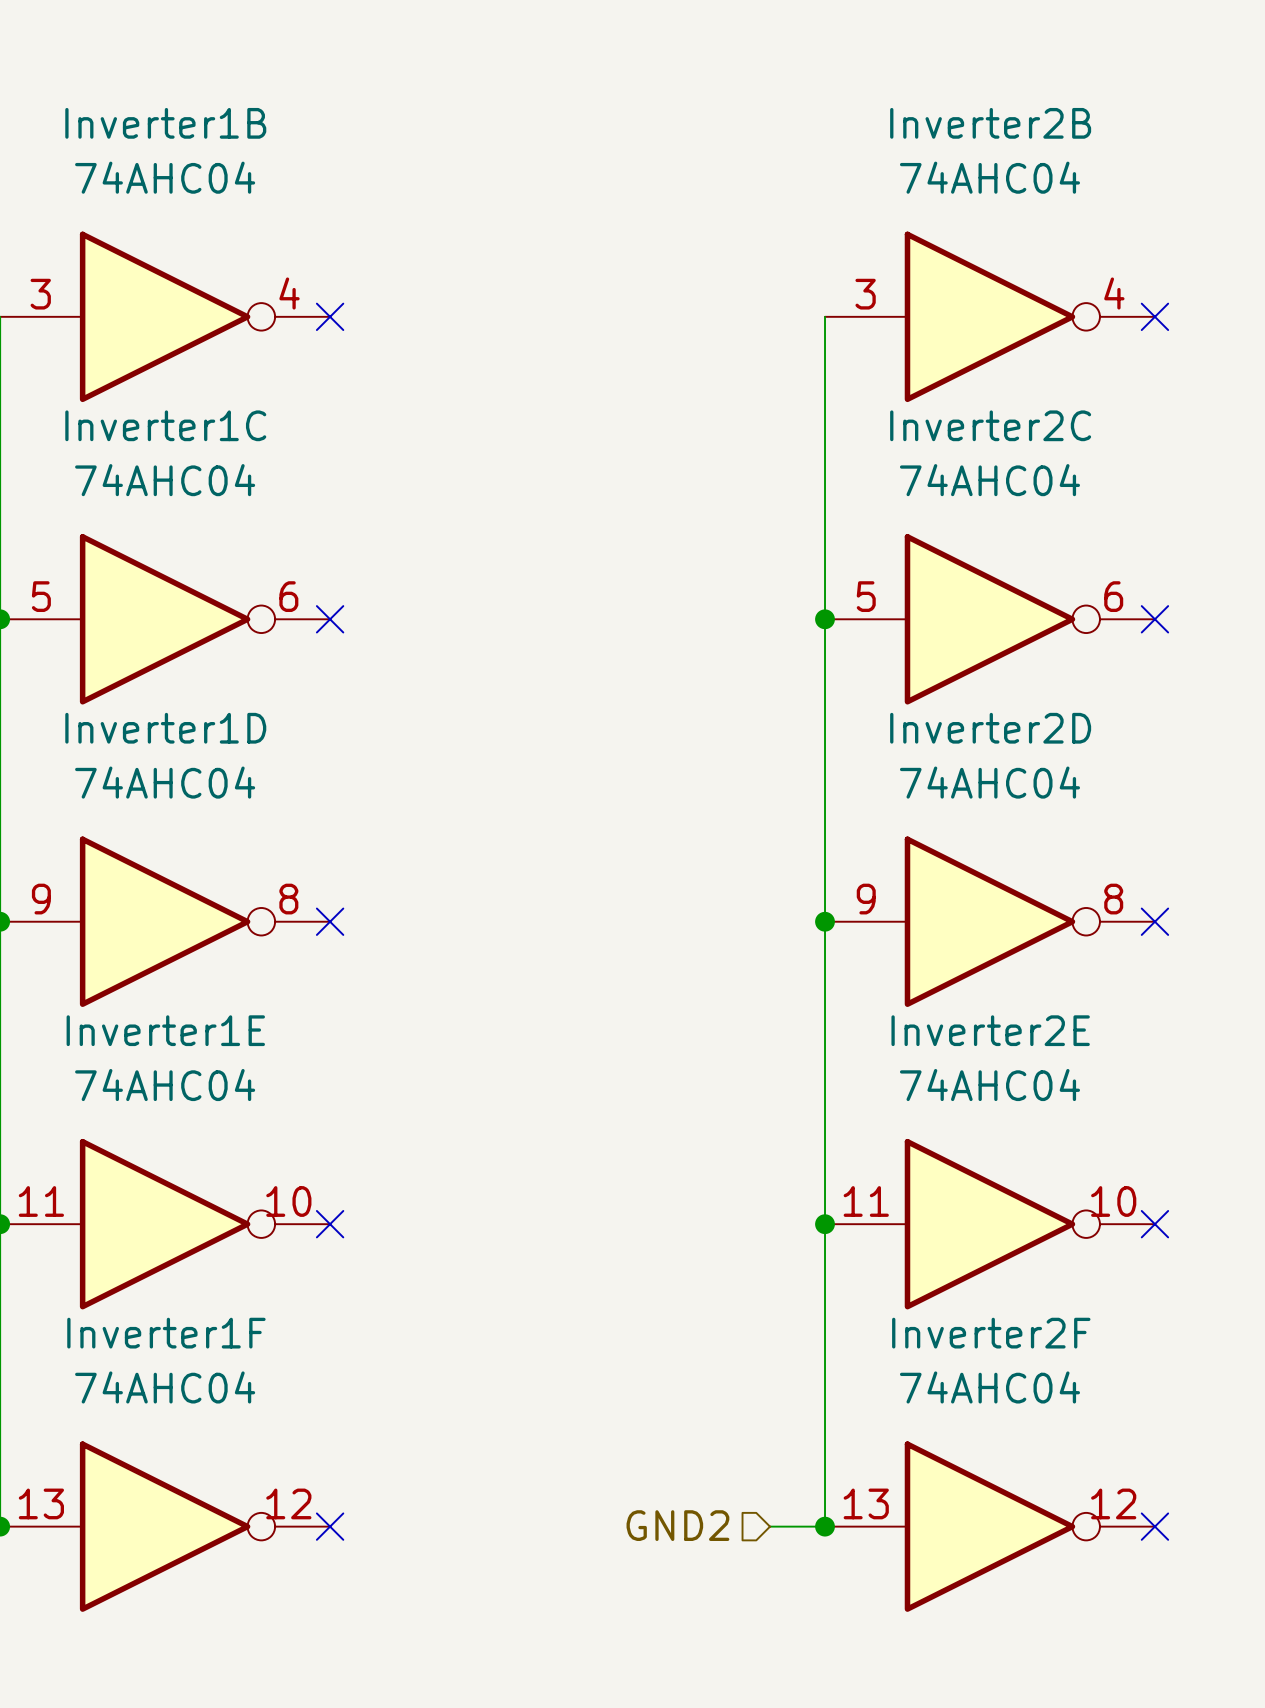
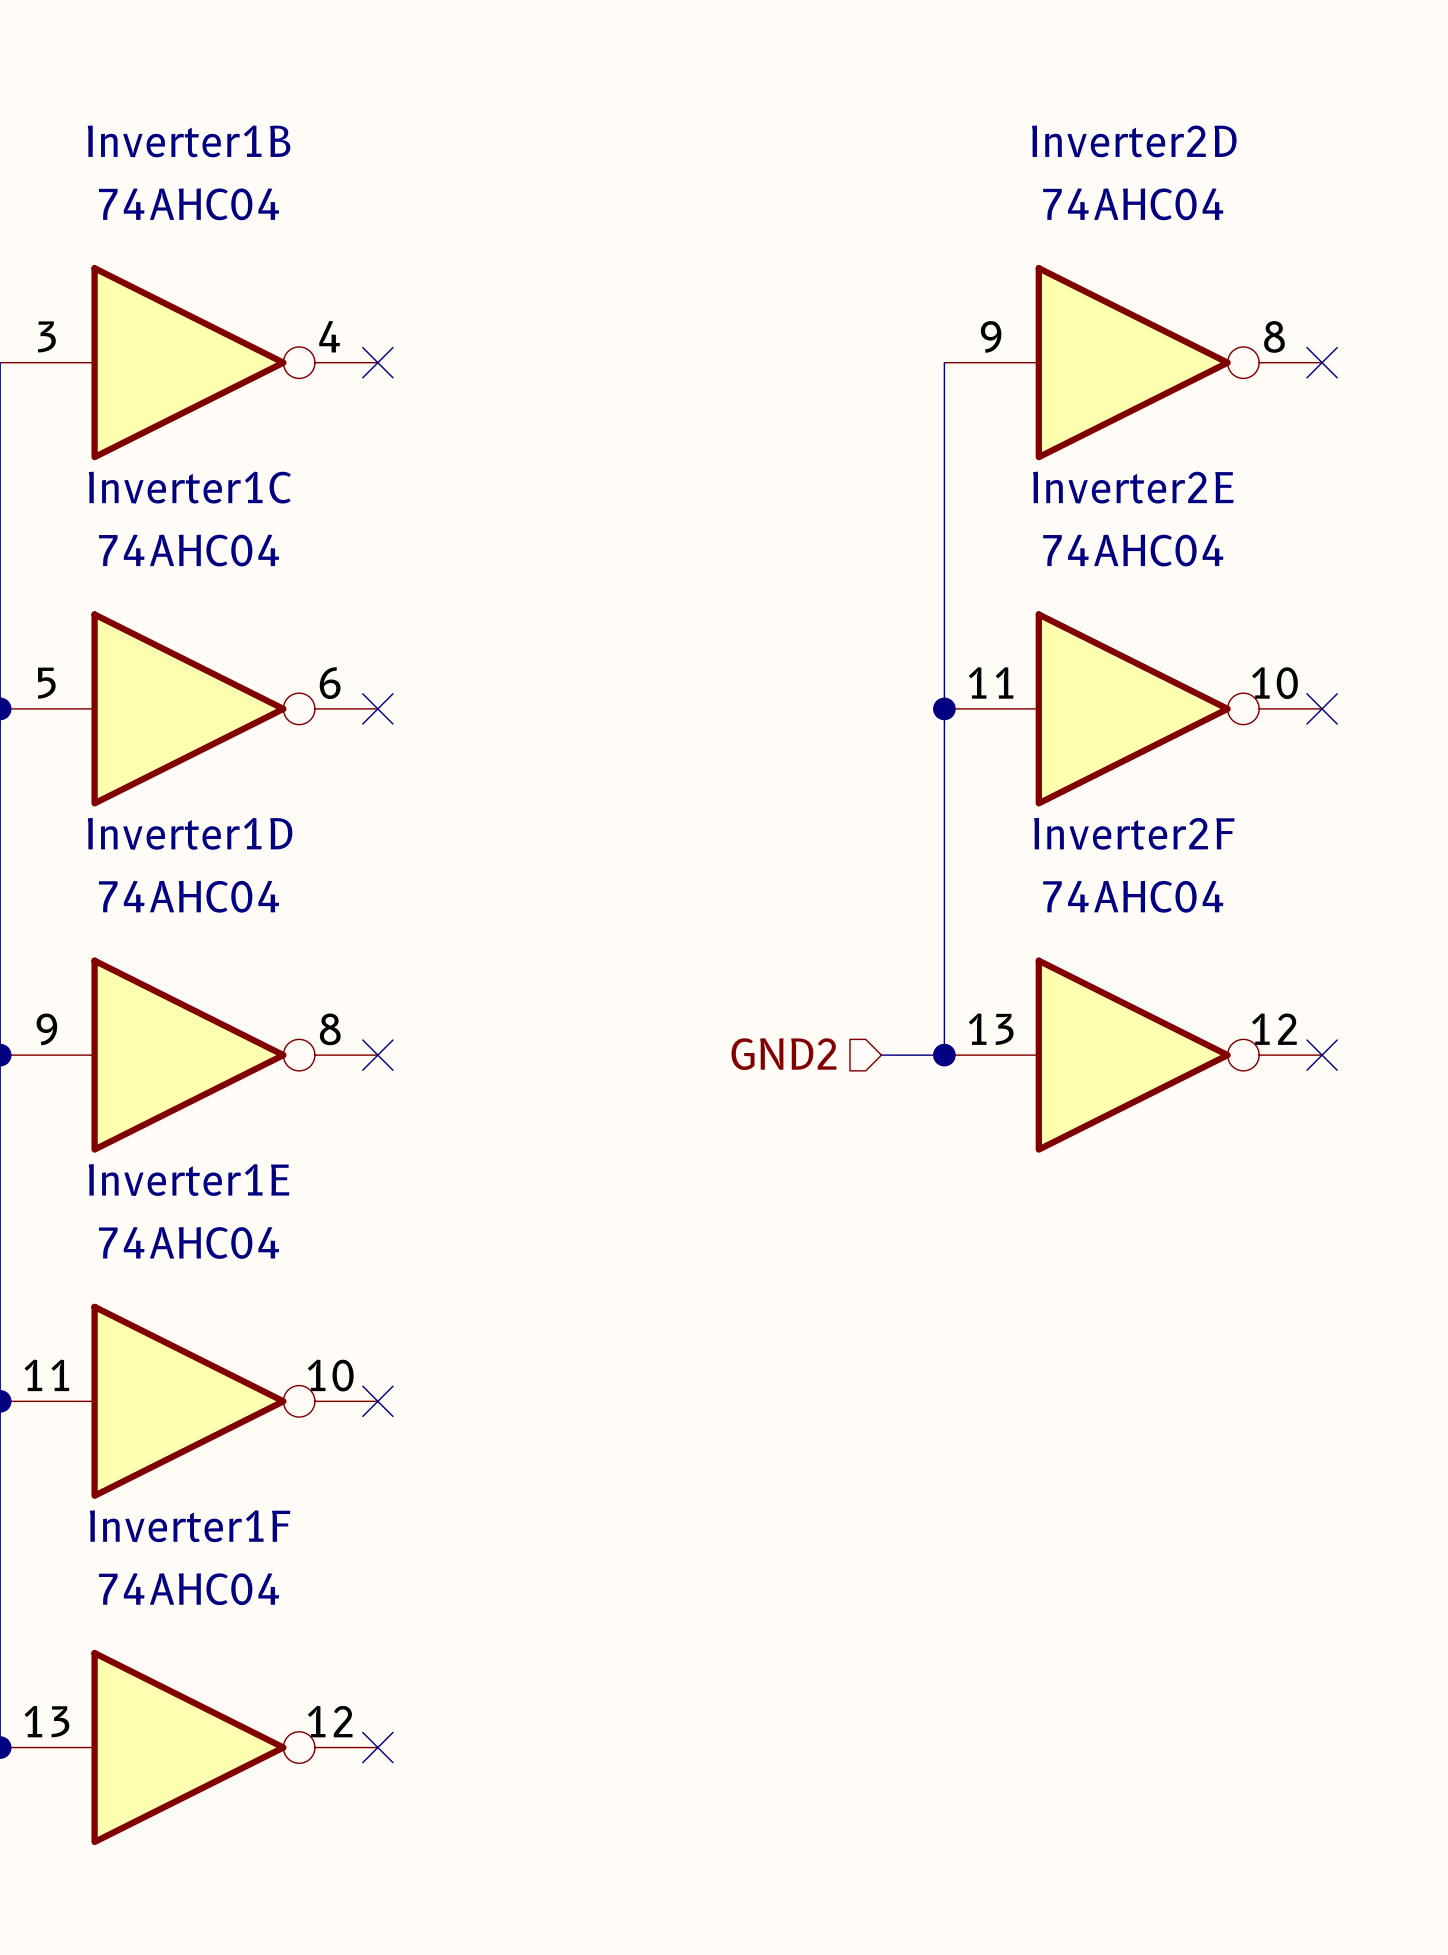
Inverter2B: 74AHC04 (989, 316) -> none
Inverter2C: 74AHC04 (989, 619) -> none
hierarchical label: none -> GND2 (783, 1054)
wire: (825, 921) (825, 1526) (770, 1526) -> (944, 1055) (881, 1055)
Inverter2D position: (989, 921) -> (1133, 362)
junction: (825, 1224) -> none
Inverter2E position: (989, 1224) -> (1133, 708)
no-connect mark: (1154, 1224) -> none
hierarchical label: GND2 (677, 1525) -> none
junction: (825, 1526) -> none
Inverter2F position: (989, 1526) -> (1133, 1055)
no-connect mark: (1154, 1526) -> none

